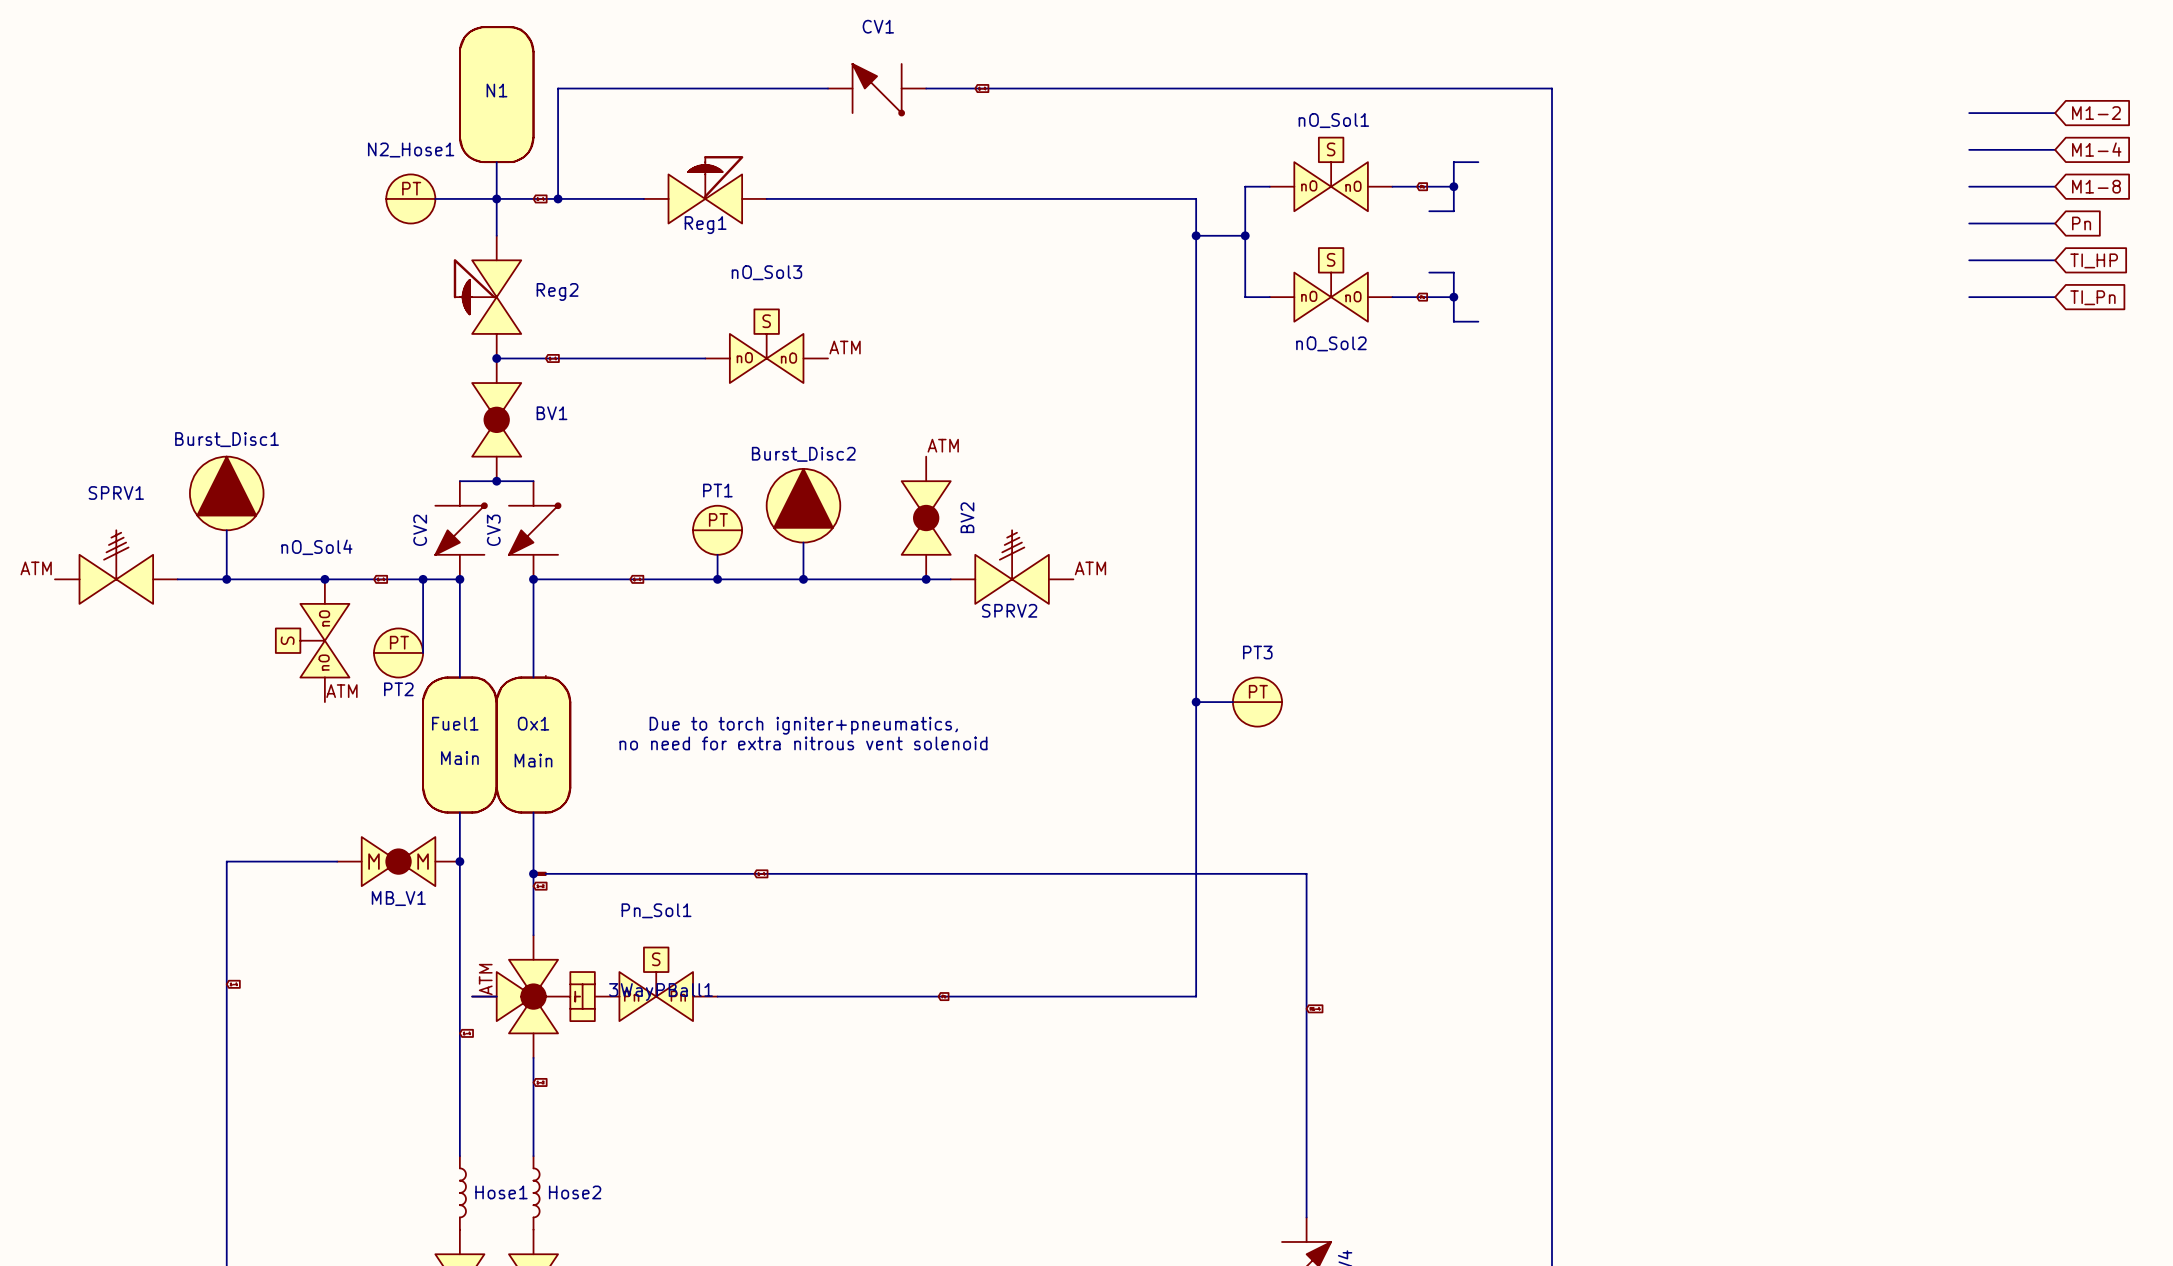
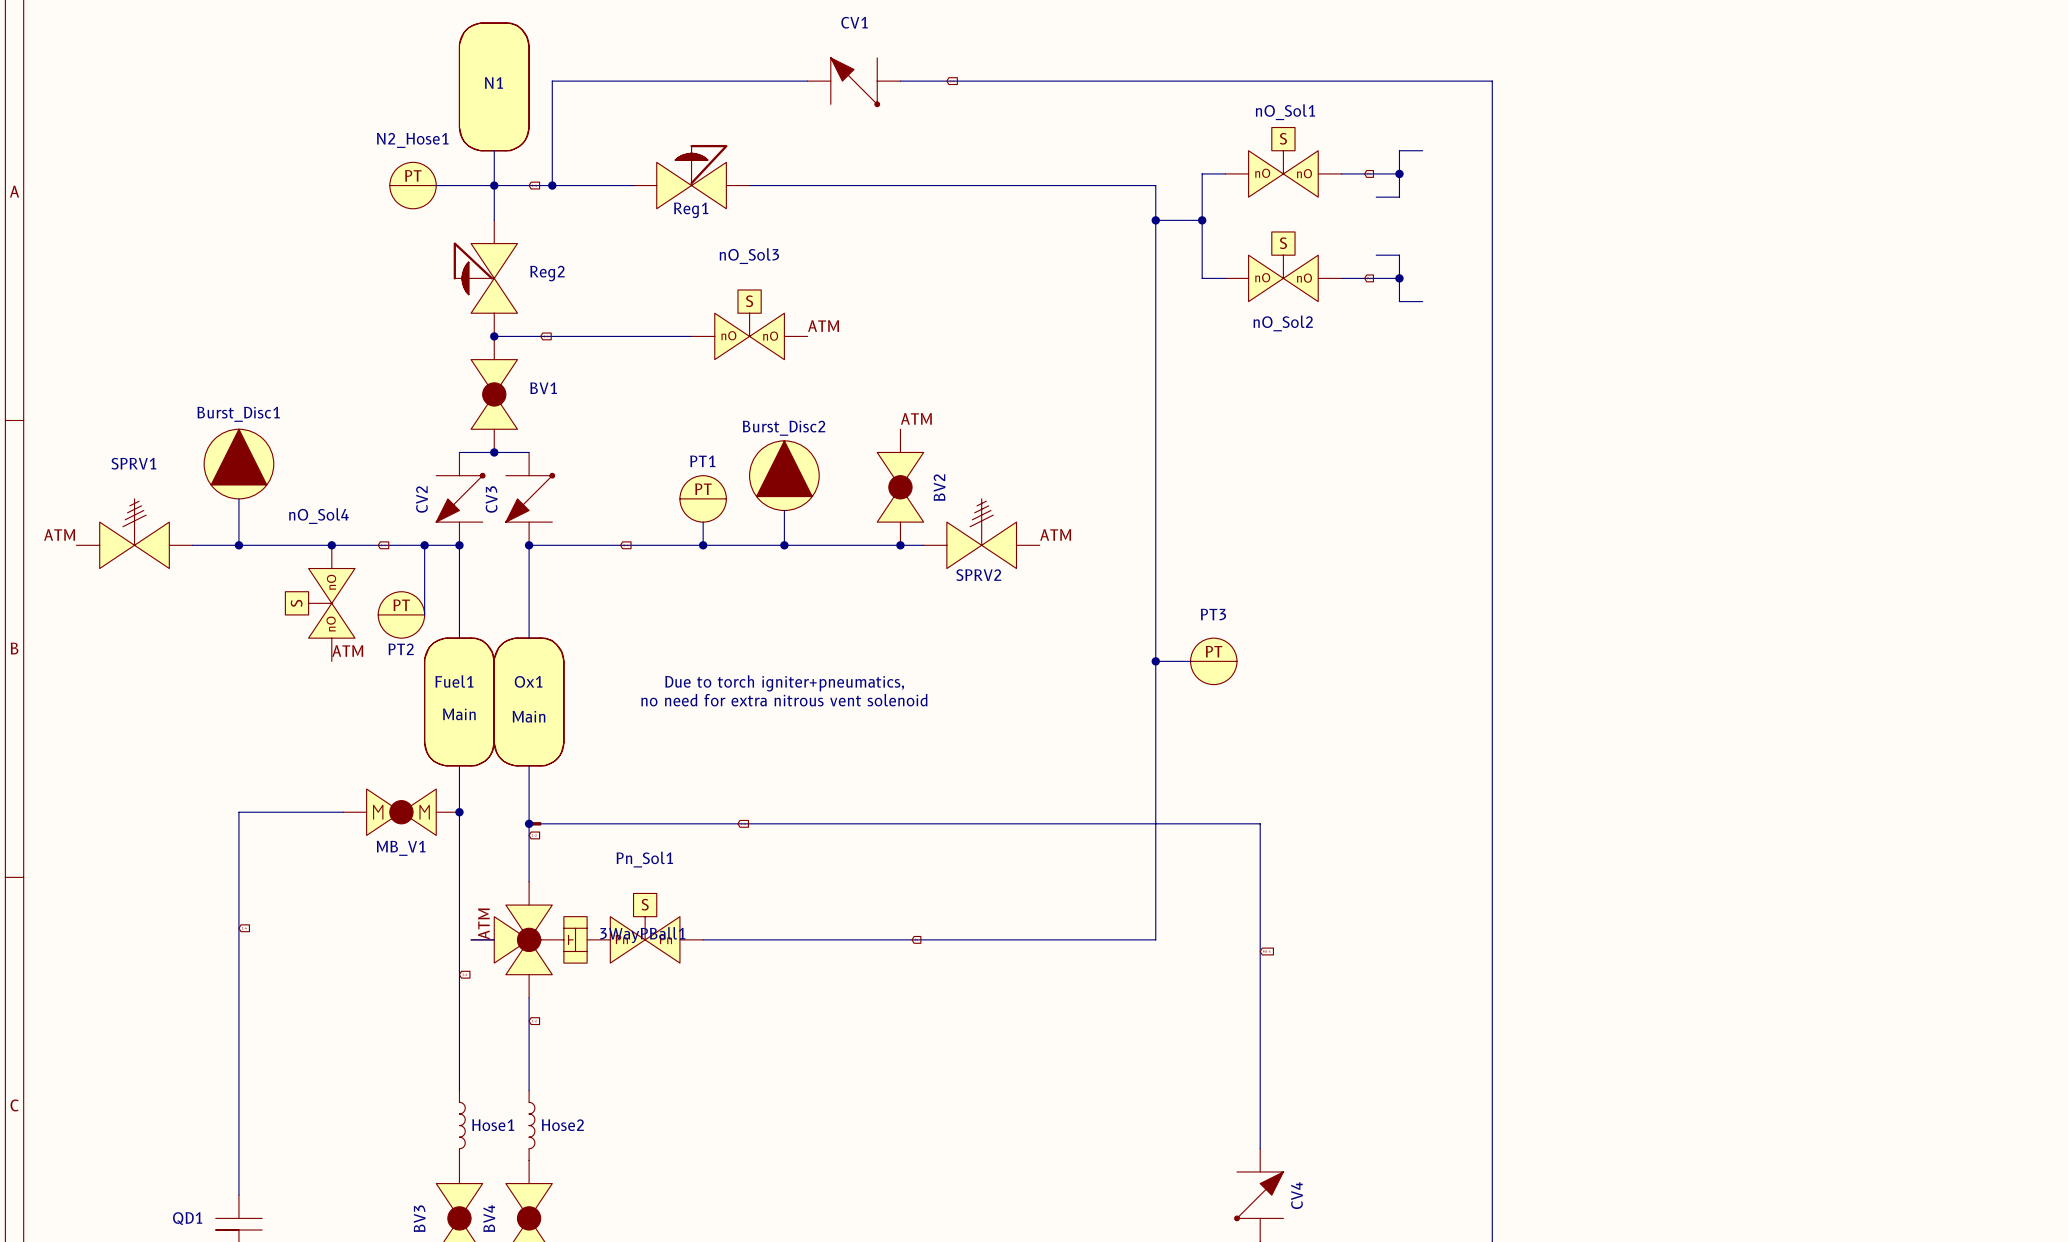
wire: (1969, 113) (2055, 113) -> none
global label: M1-2 (2096, 113) -> none
wire: (1969, 149) (2055, 149) -> none
global label: M1-4 (2096, 149) -> none
wire: (1969, 186) (2055, 186) -> none
global label: M1-8 (2096, 186) -> none
wire: (1969, 223) (2055, 223) -> none
global label: Pn (2081, 223) -> none
wire: (1969, 260) (2055, 260) -> none
global label: TI_HP (2094, 260) -> none
wire: (1969, 297) (2055, 297) -> none
global label: TI_Pn (2092, 297) -> none

